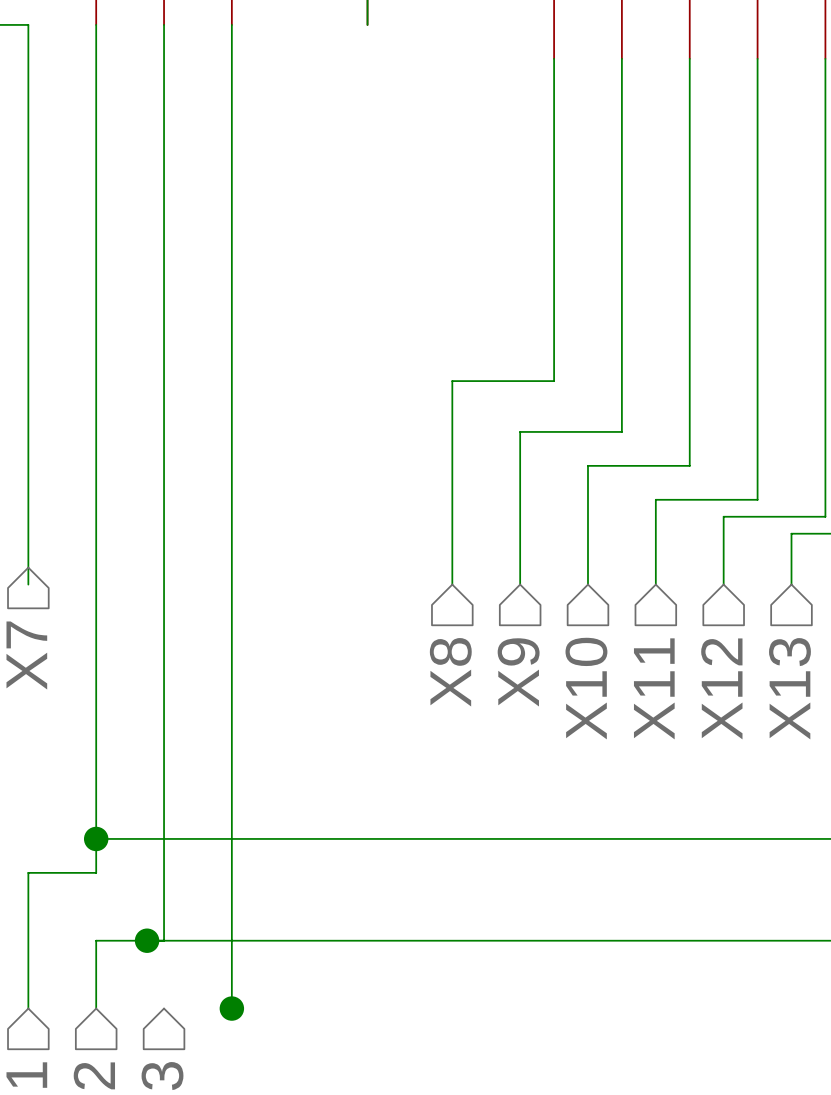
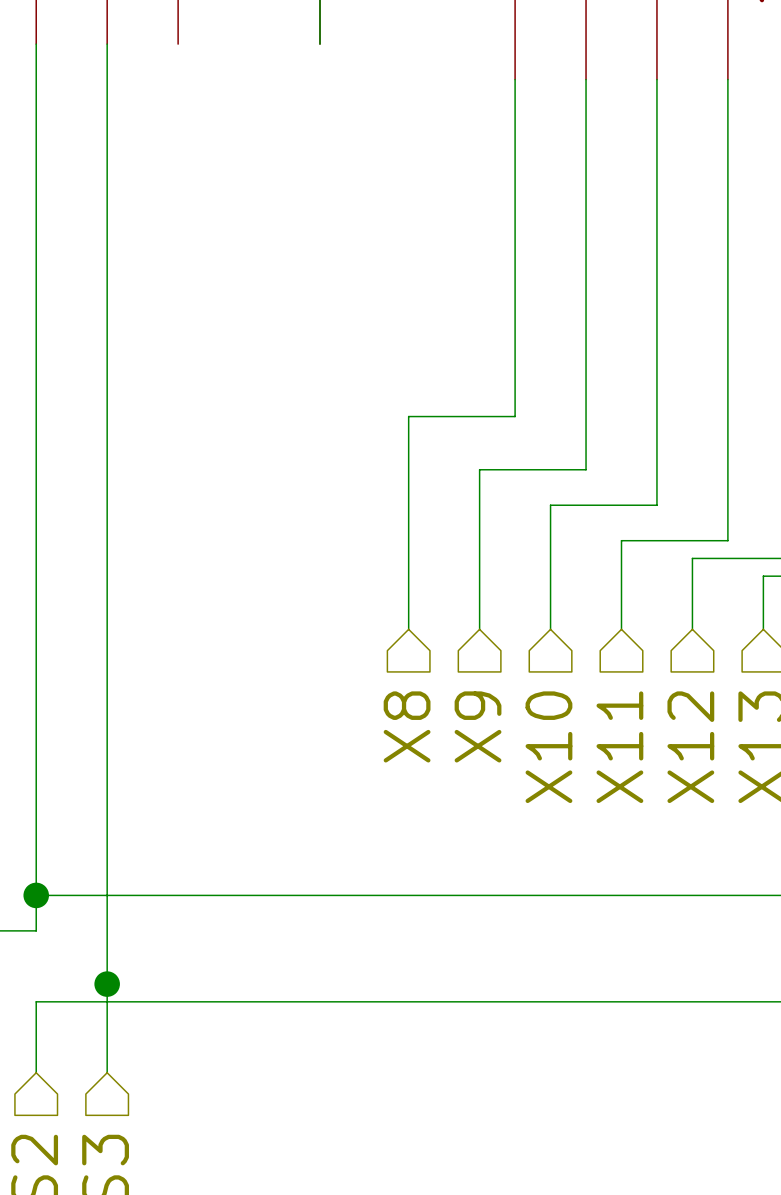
wire: (231, 24) (231, 1008) -> none
junction position: (147, 940) -> (107, 984)
wire: none -> (107, 1001) (107, 1072)
junction: (231, 1008) -> none

